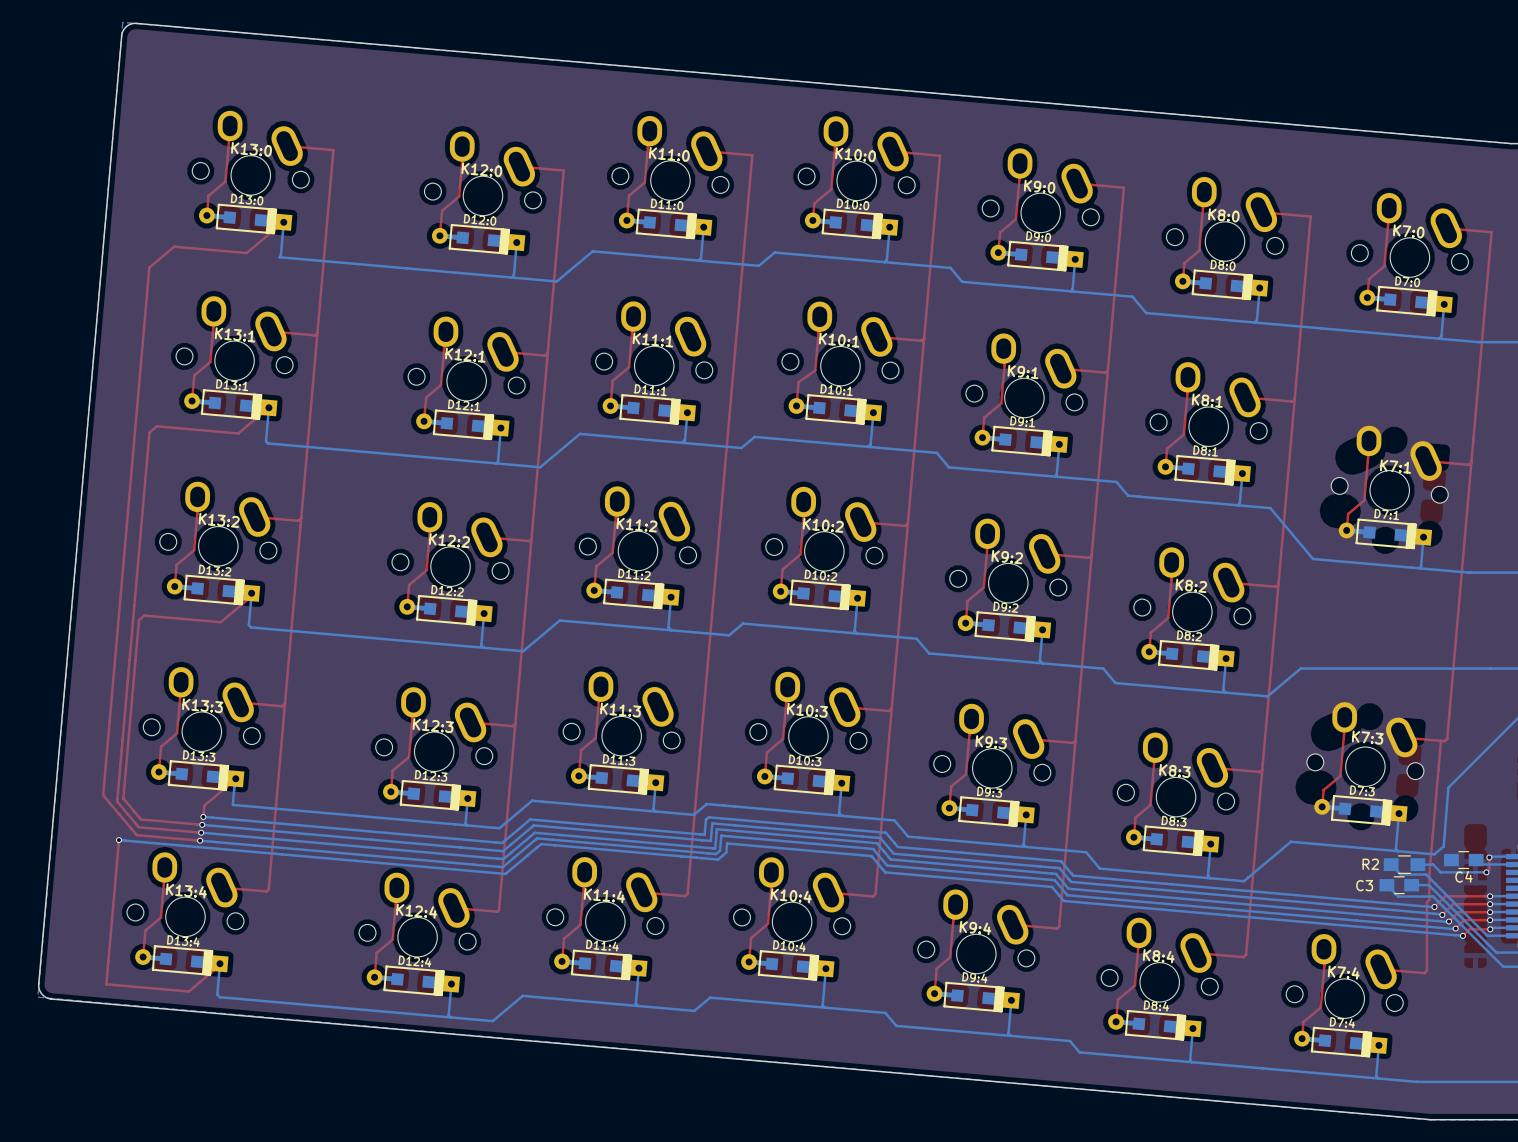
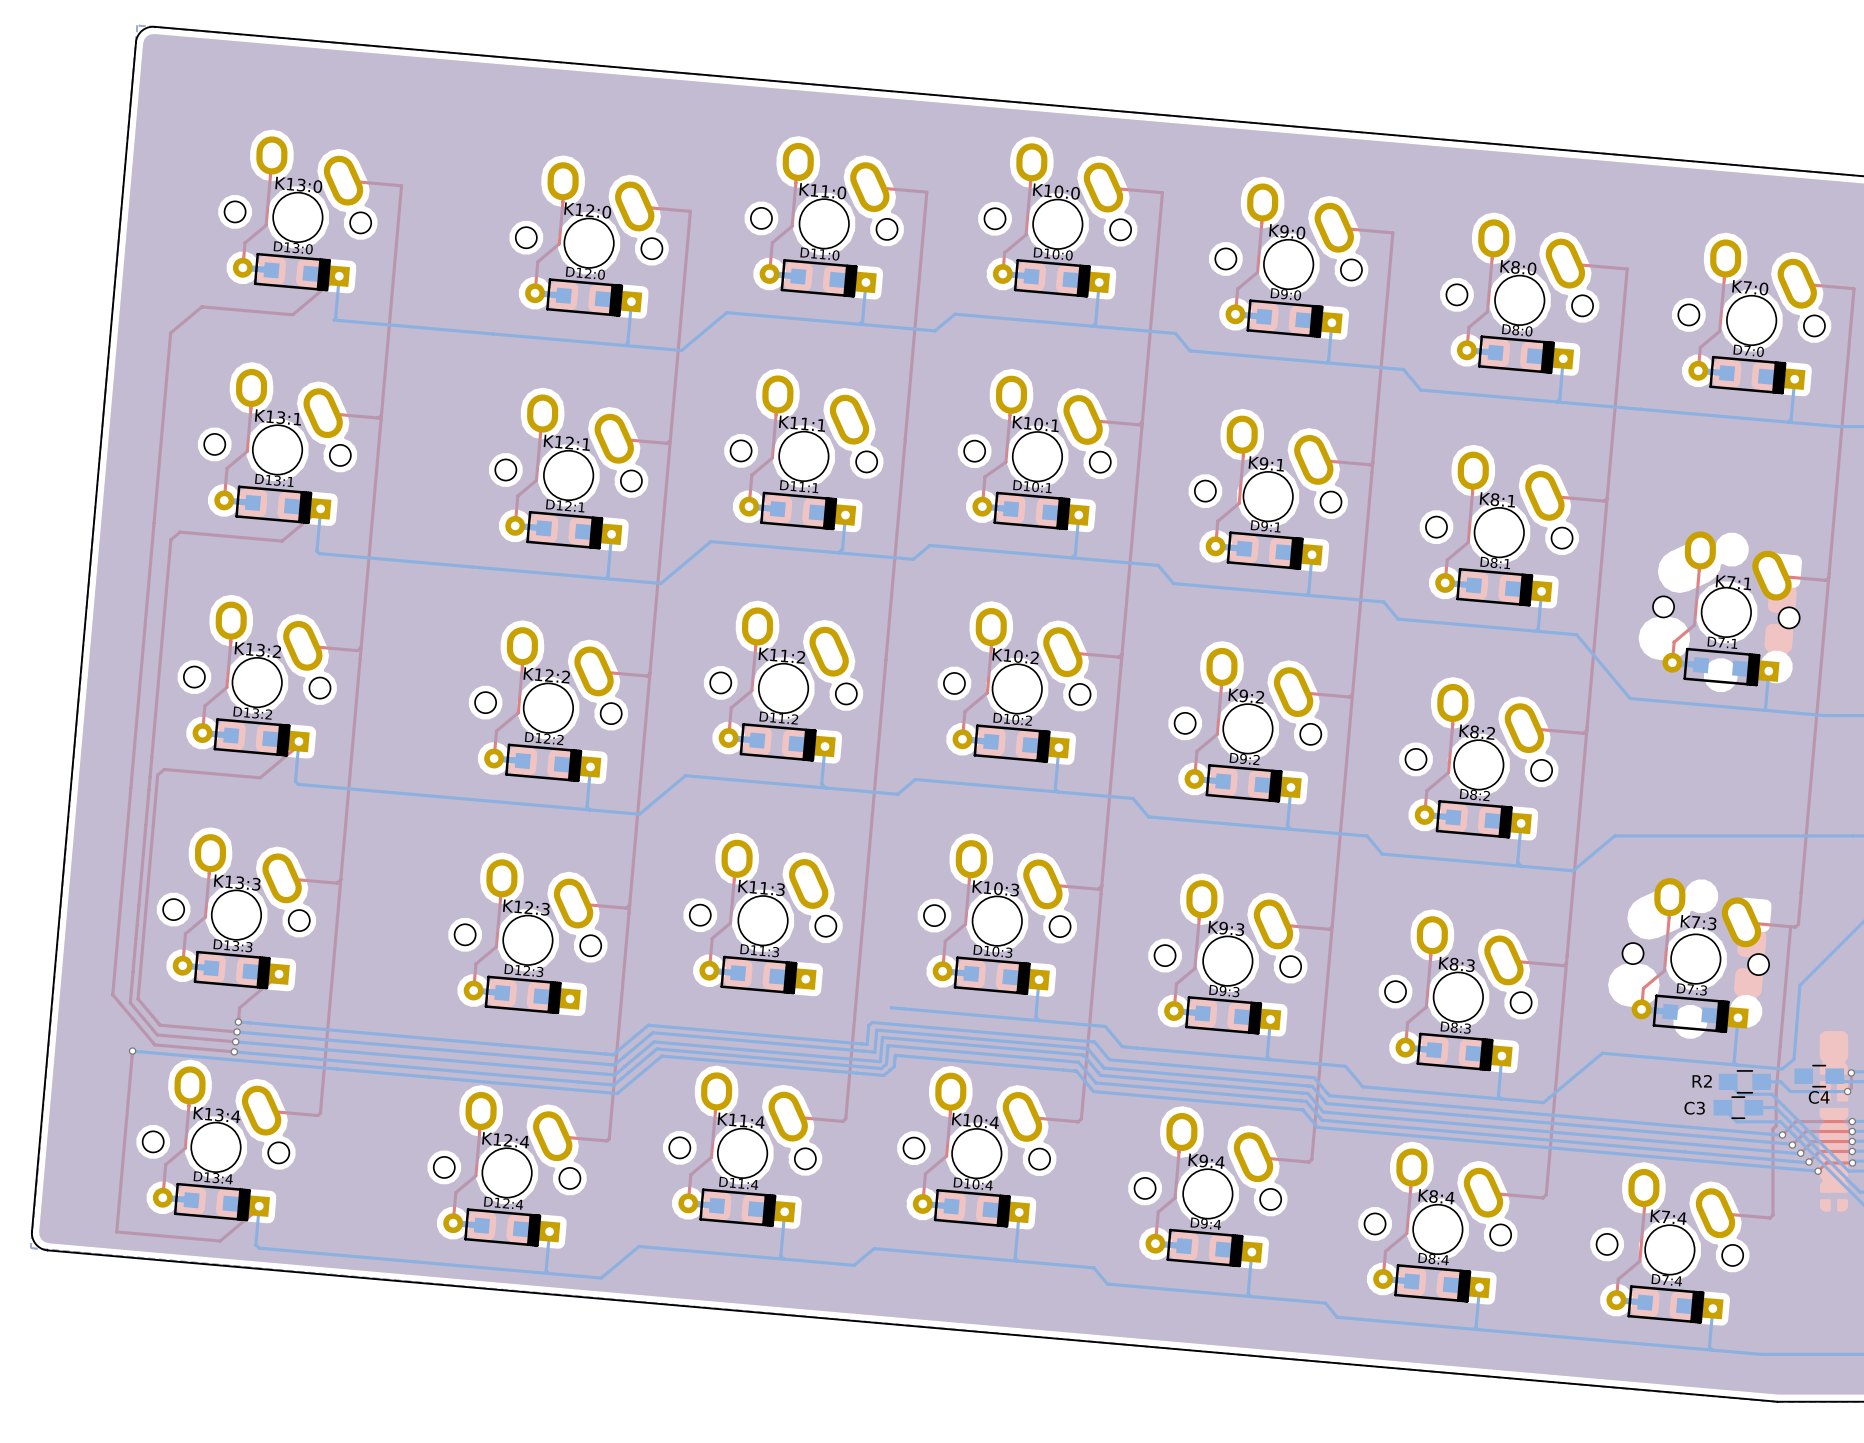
bottom track: (235, 778) (232, 804) (499, 828) (532, 800) (693, 814) (706, 804) (723, 805) -> none
bottom track: (655, 782) (653, 809) (655, 811) -> none
bottom track: (467, 798) (465, 823) (467, 825) -> none

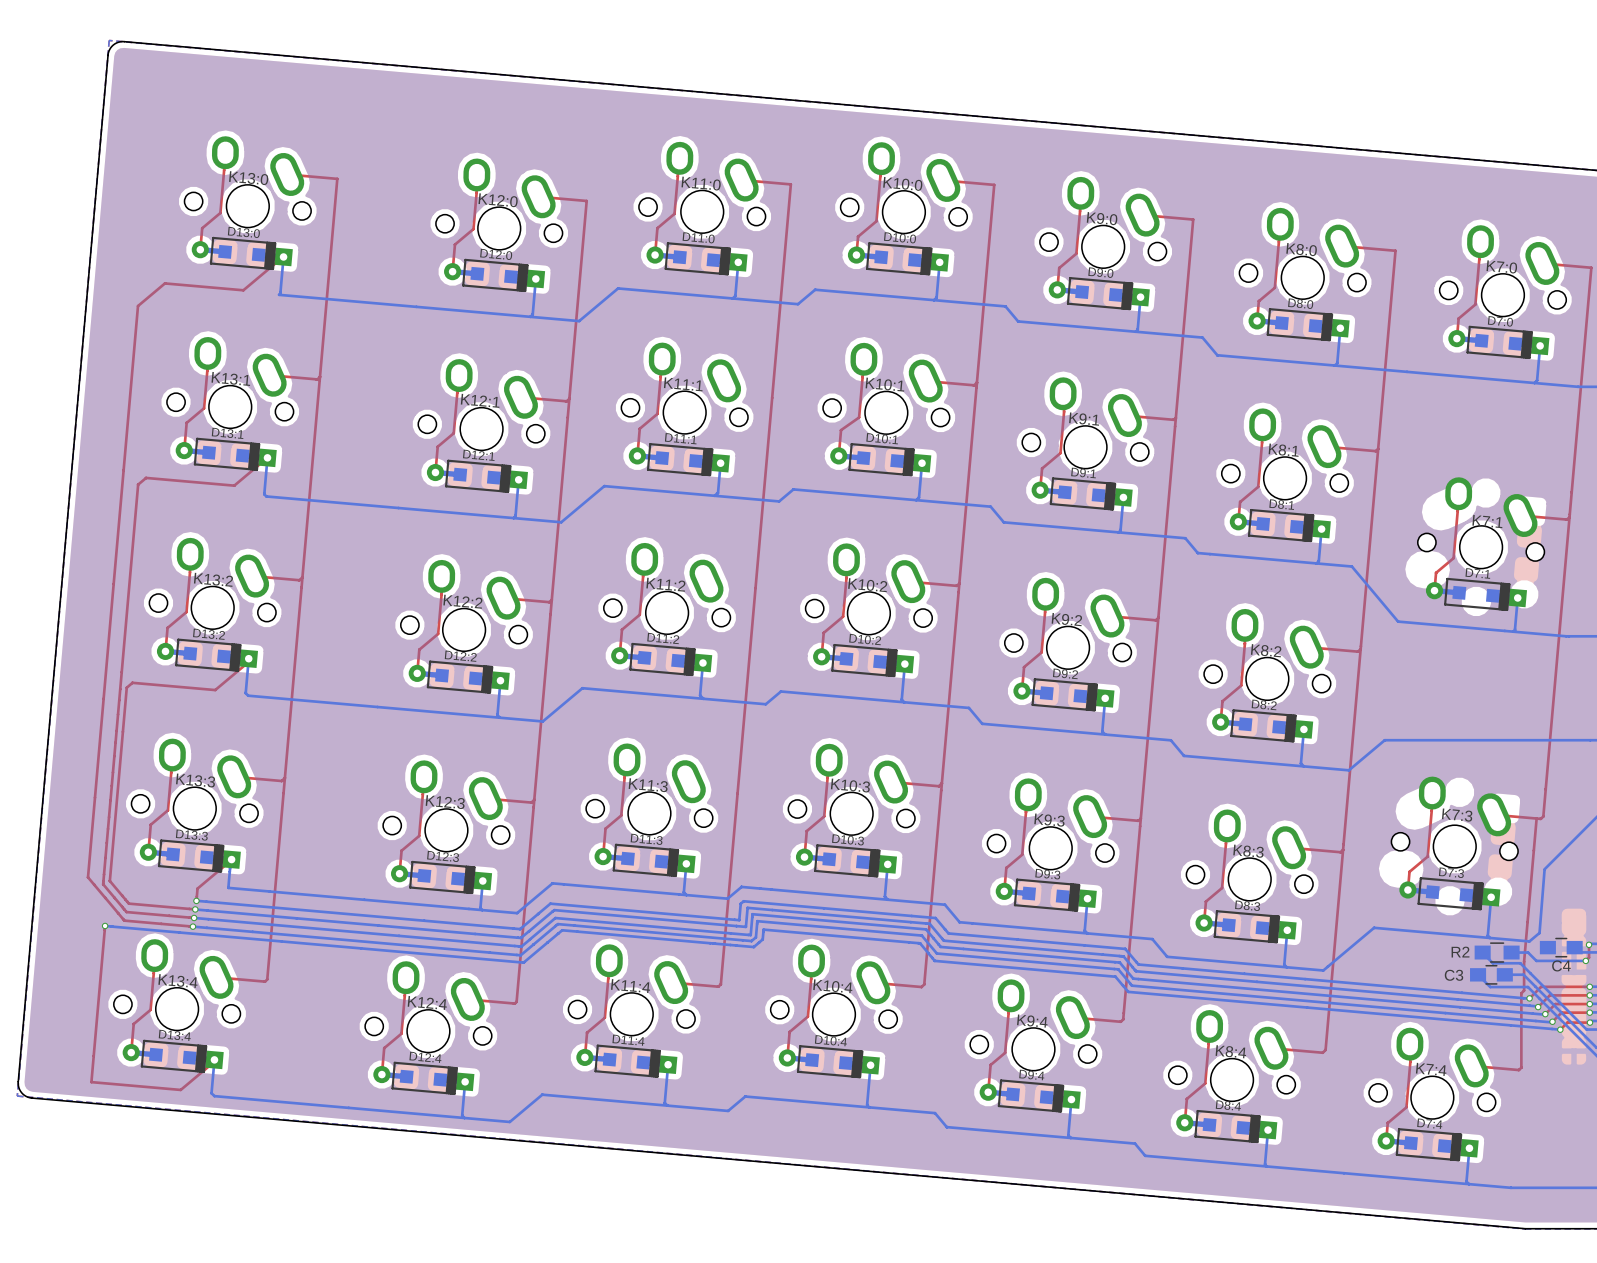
bottom track: none -> (231, 859) (228, 887) (517, 913) (552, 883) (727, 898) (741, 887) (760, 888)
bottom track: none -> (686, 863) (683, 892) (686, 895)
bottom track: none -> (482, 880) (480, 907) (482, 910)

